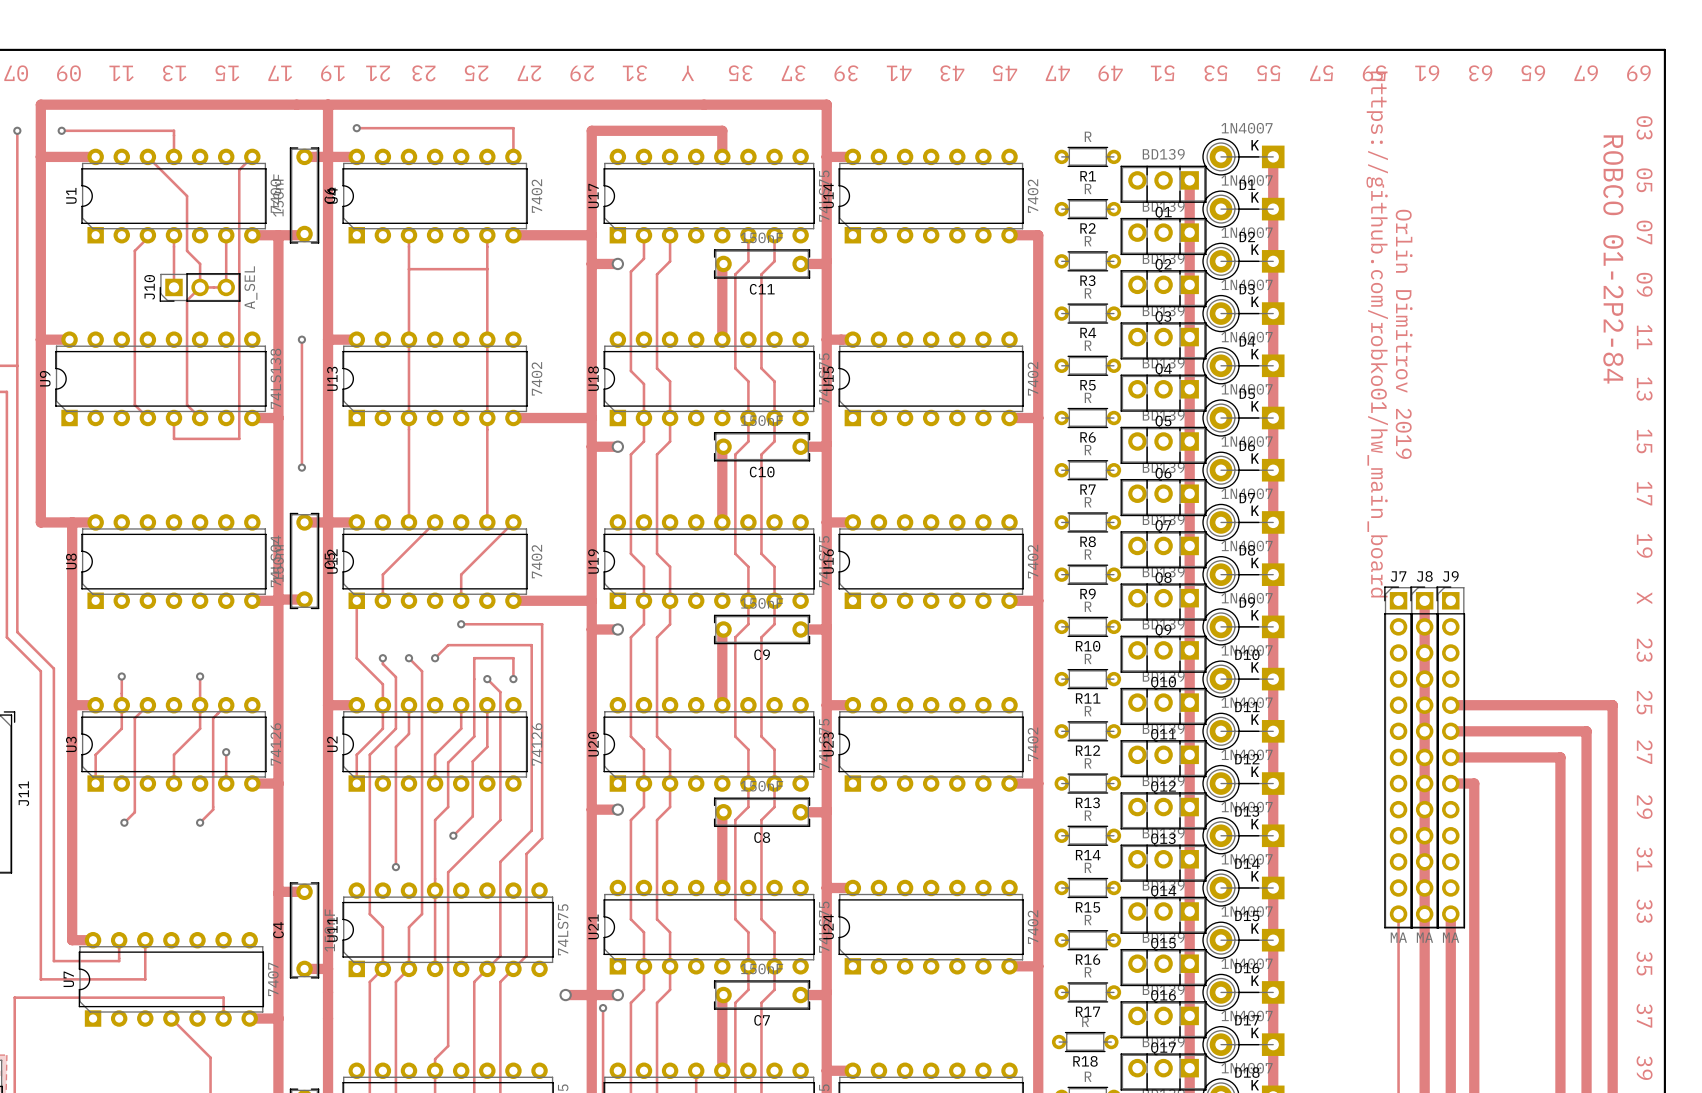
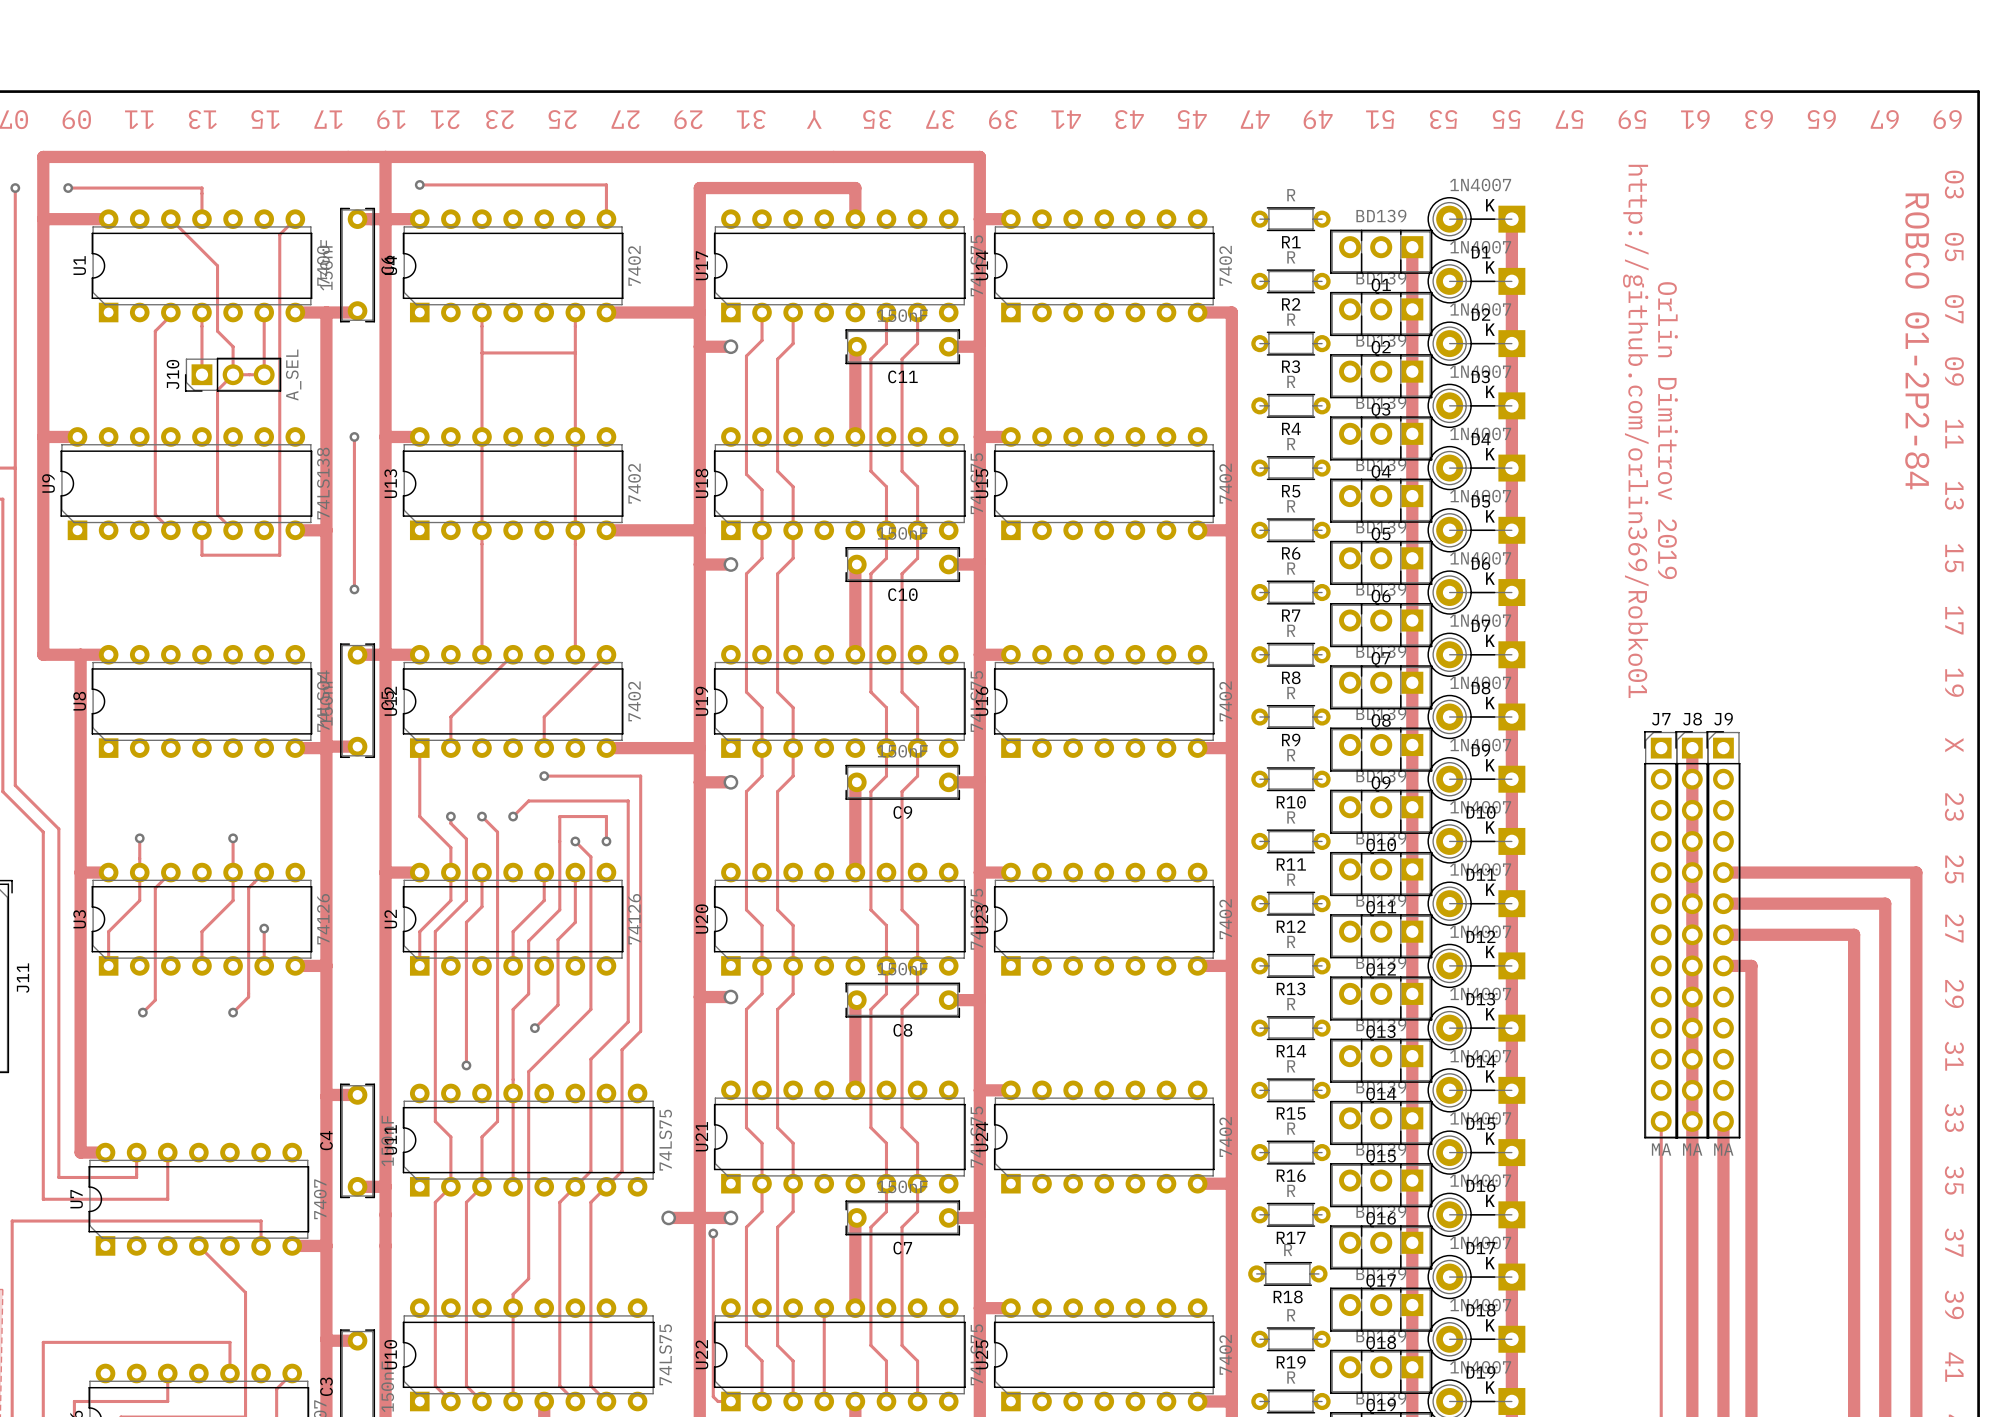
text: https://github.com/robko01/hw_main_board (1377, 334) -> http://github.com/orlin369/Robko01 (1635, 431)

